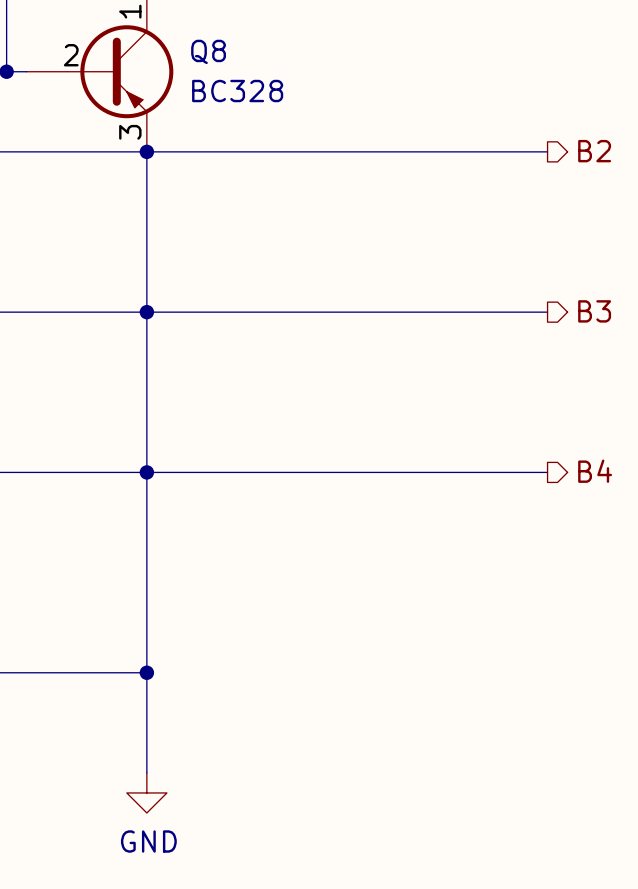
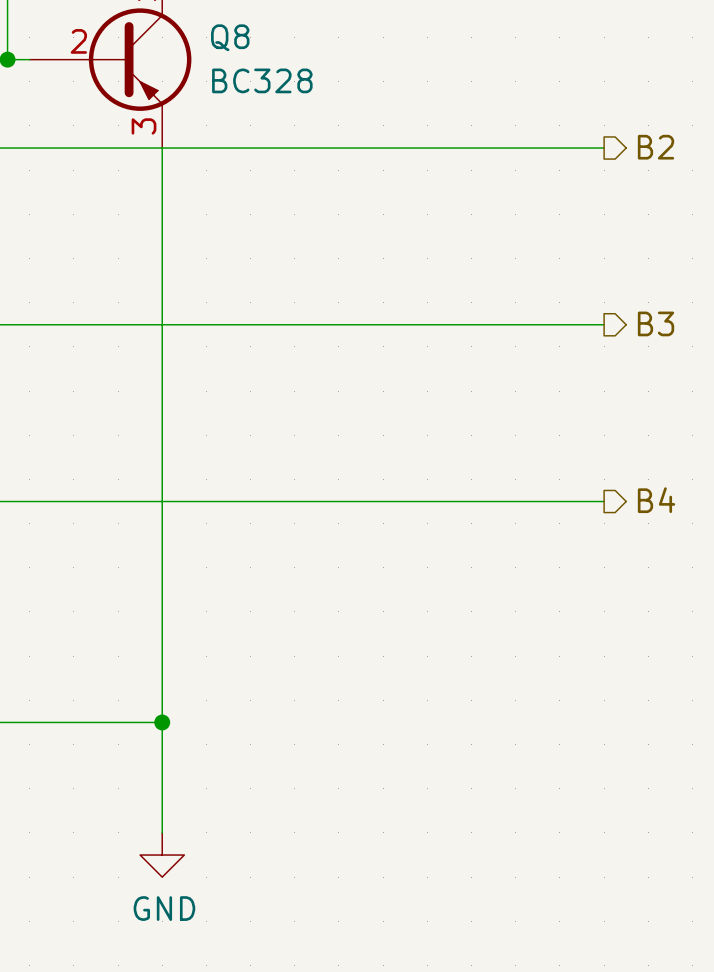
junction: (146, 151) -> none
junction: (146, 312) -> none
junction: (146, 472) -> none

